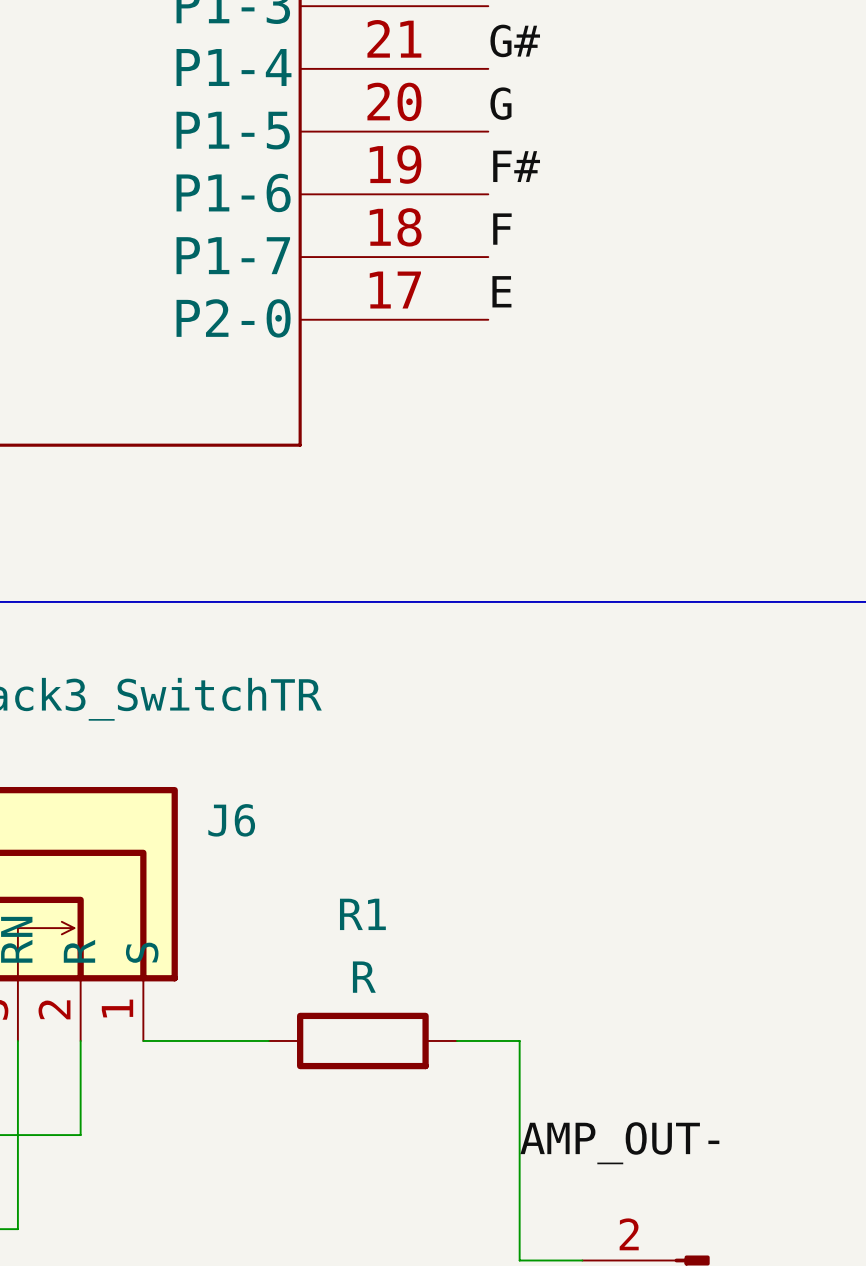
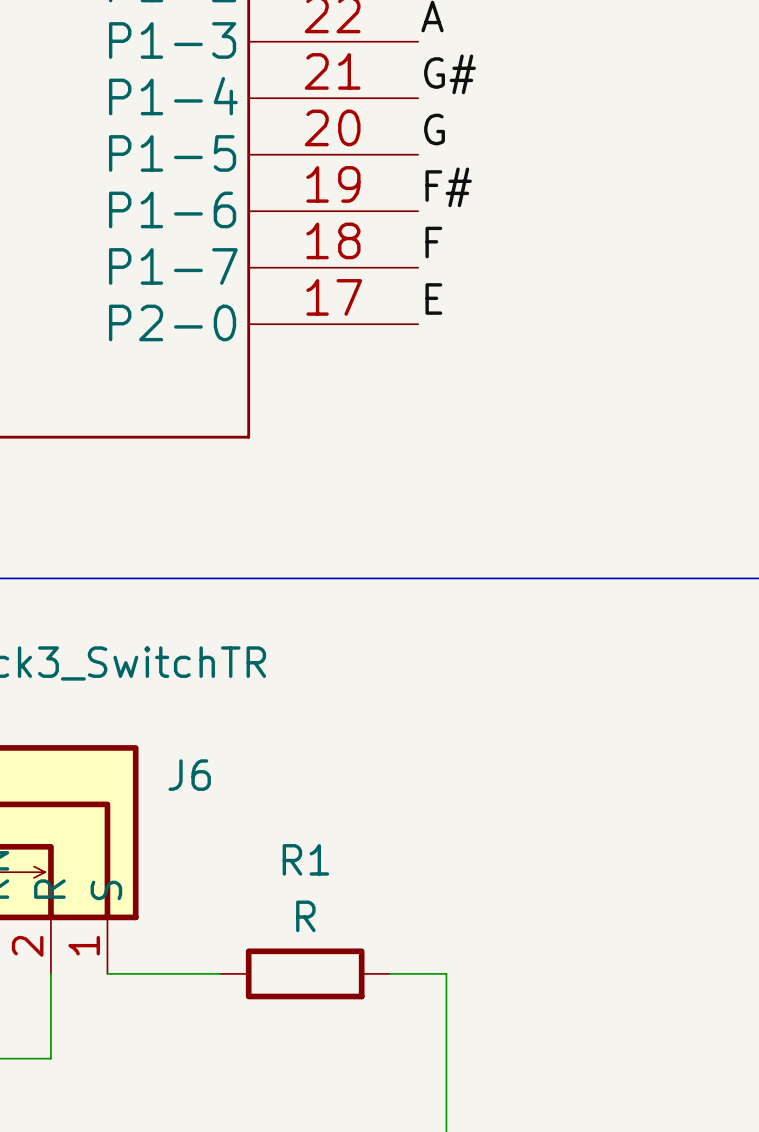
label: AMP_OUT- (619, 1143) -> none

